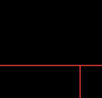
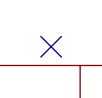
no-connect mark: none -> (51, 46)

